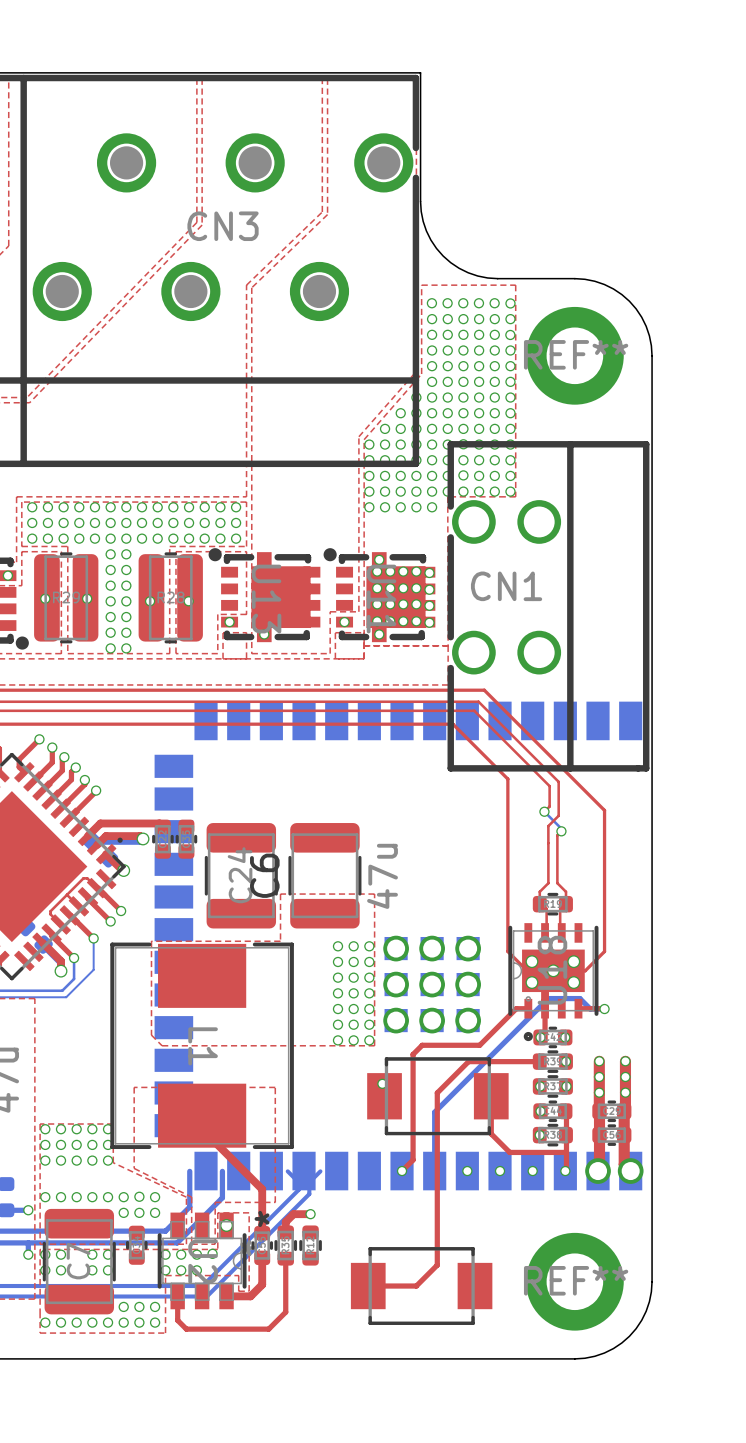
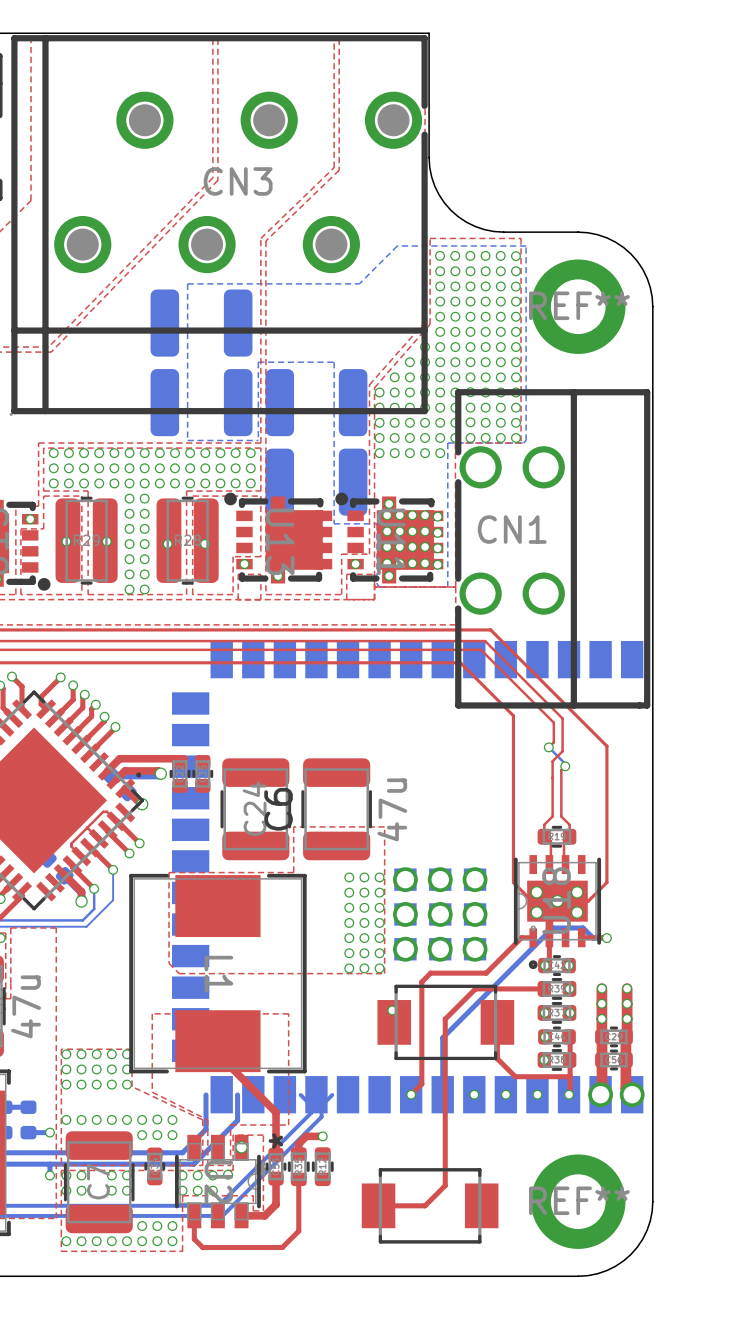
bottom zone outline: none -> (397, 246) (526, 246) (526, 440) (523, 443) (447, 443) (447, 587) (379, 587) (377, 584) (377, 523) (334, 523) (334, 362) (258, 362) (258, 440) (187, 440) (187, 283) (359, 283) (397, 246)
part: none -> (201, 323)
part: none -> (201, 402)
part: none -> (316, 402)
part: none -> (316, 482)

